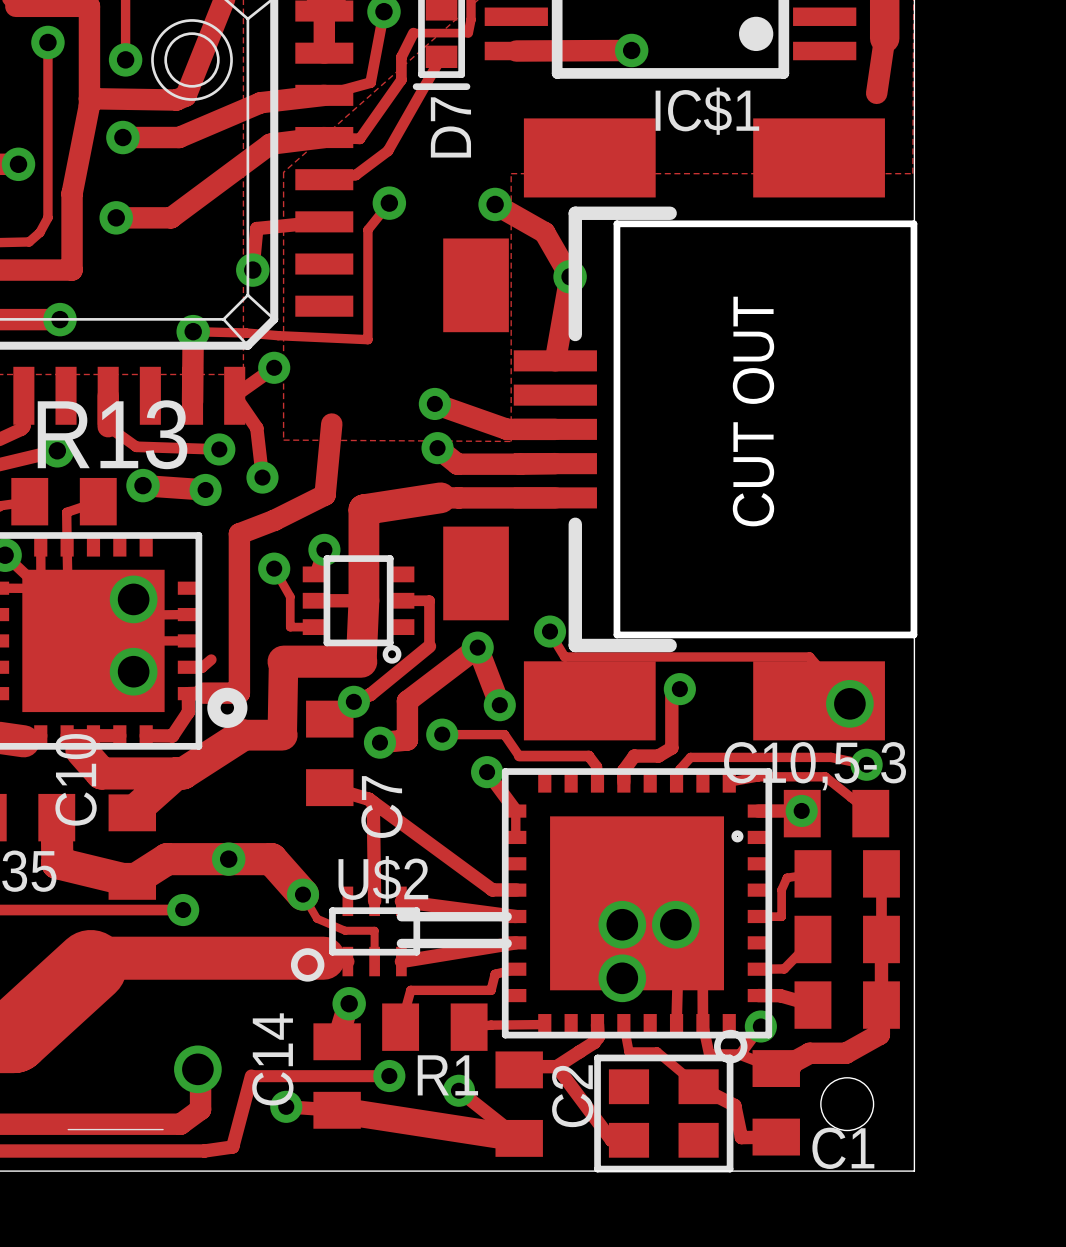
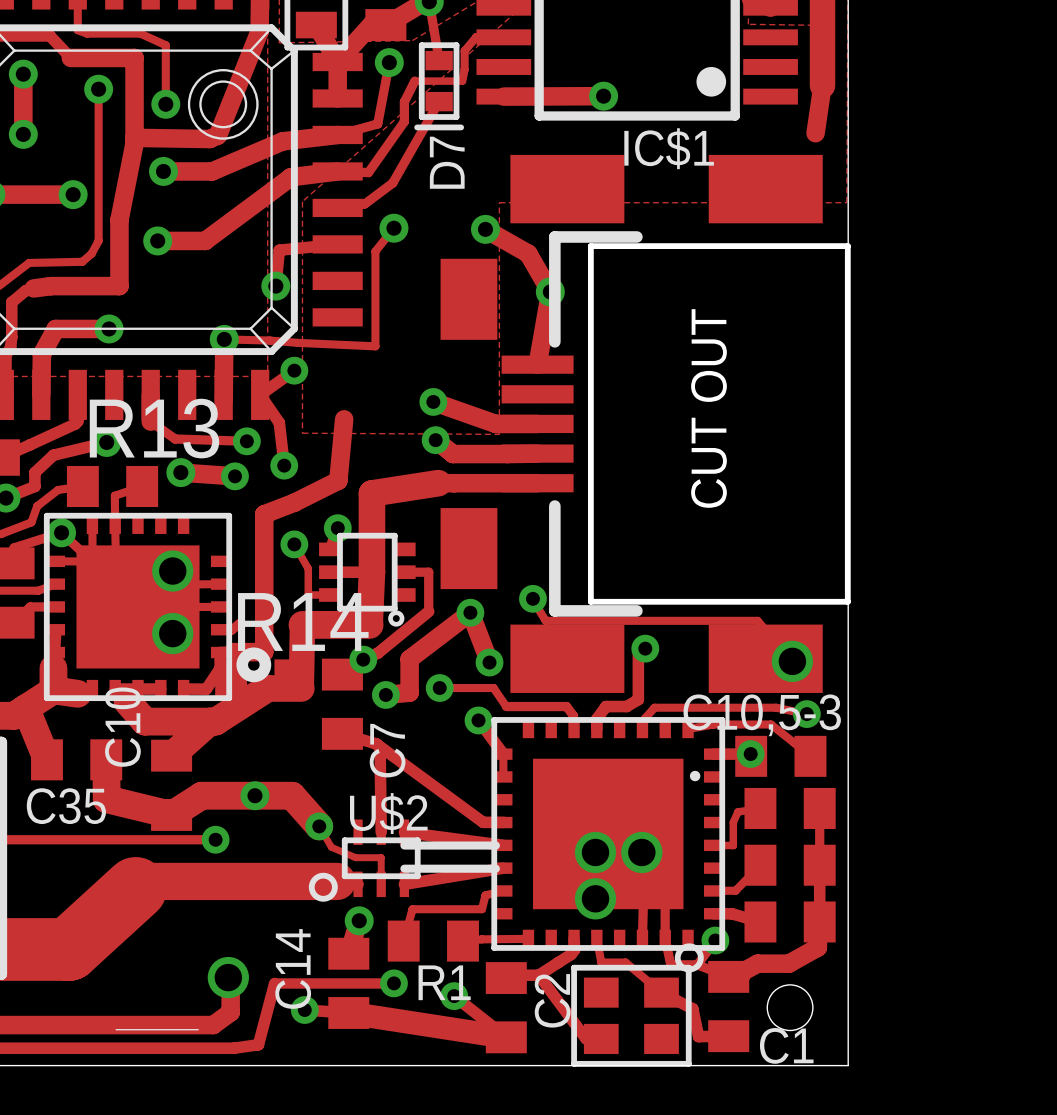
R14: none -> (260, 679)

